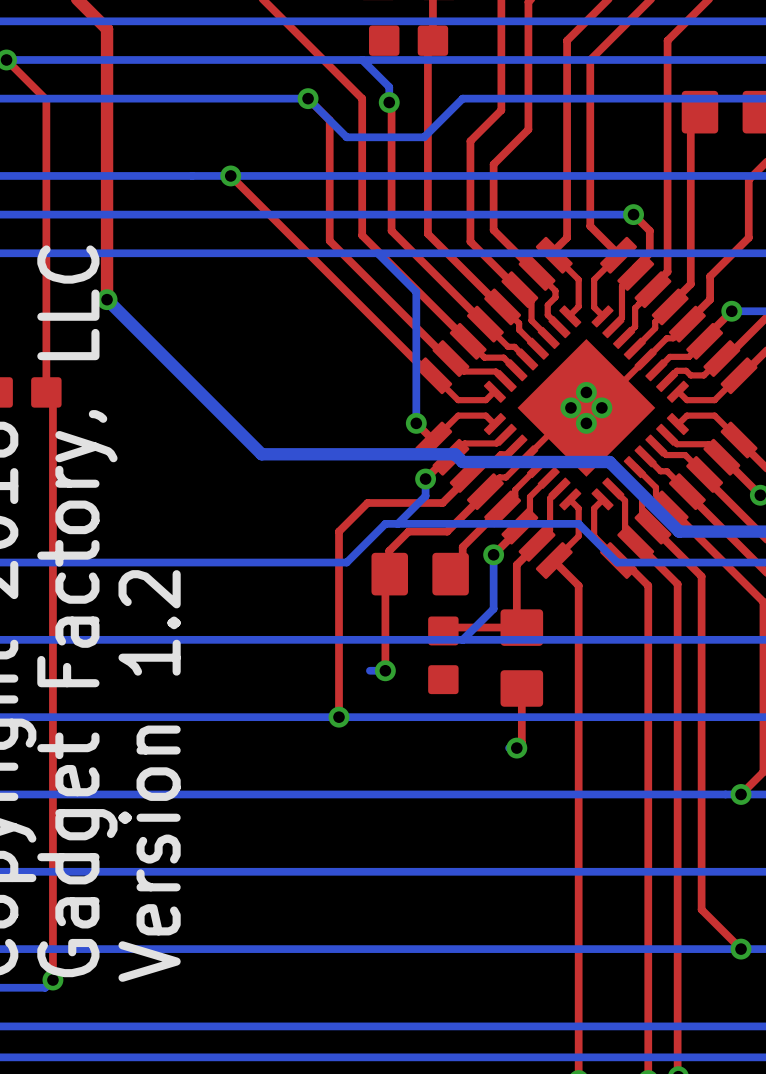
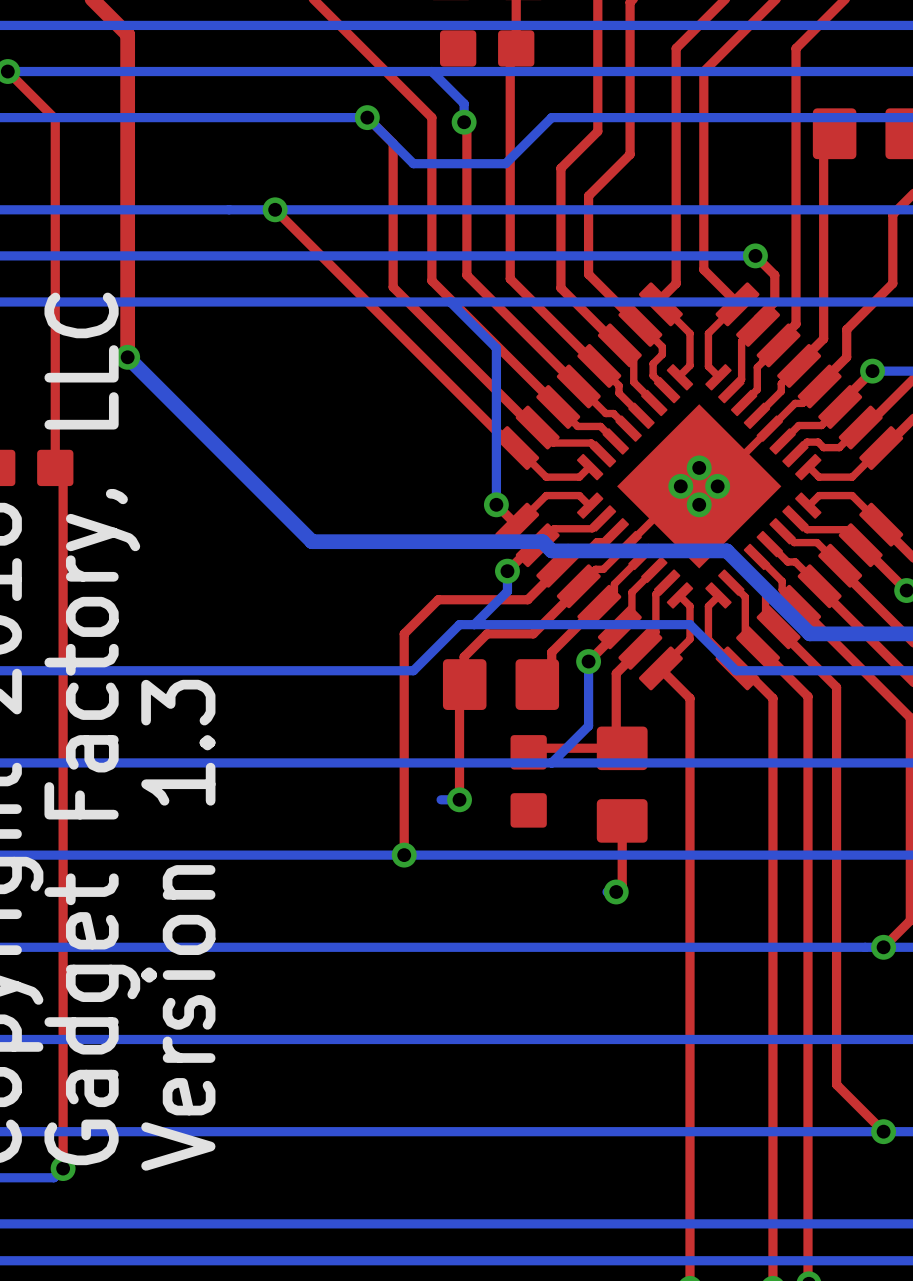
text: Version 1.2 (149, 775) -> Version 1.3 (178, 925)

